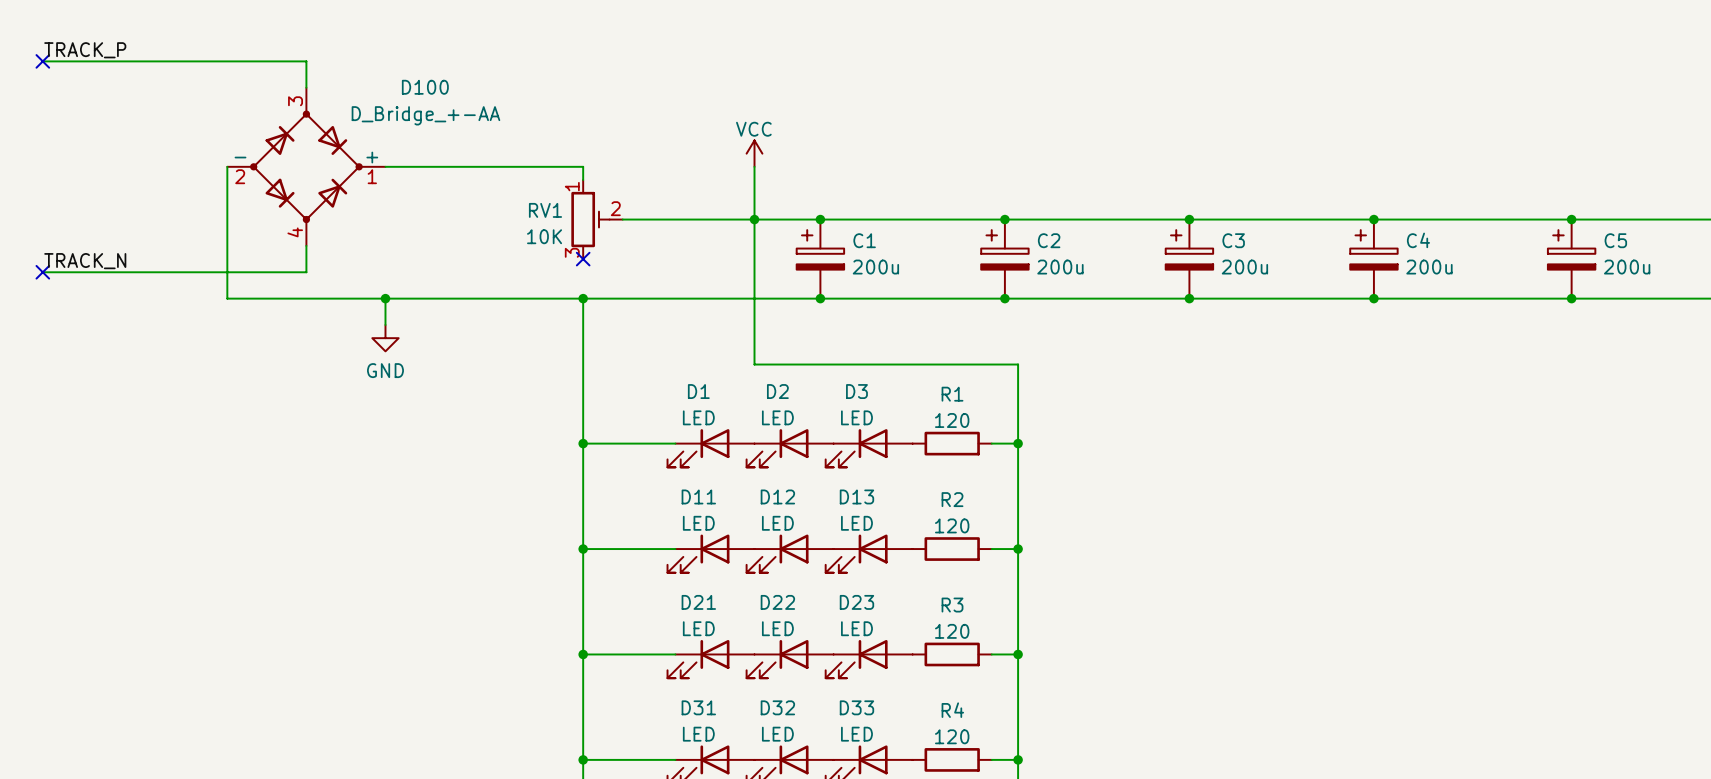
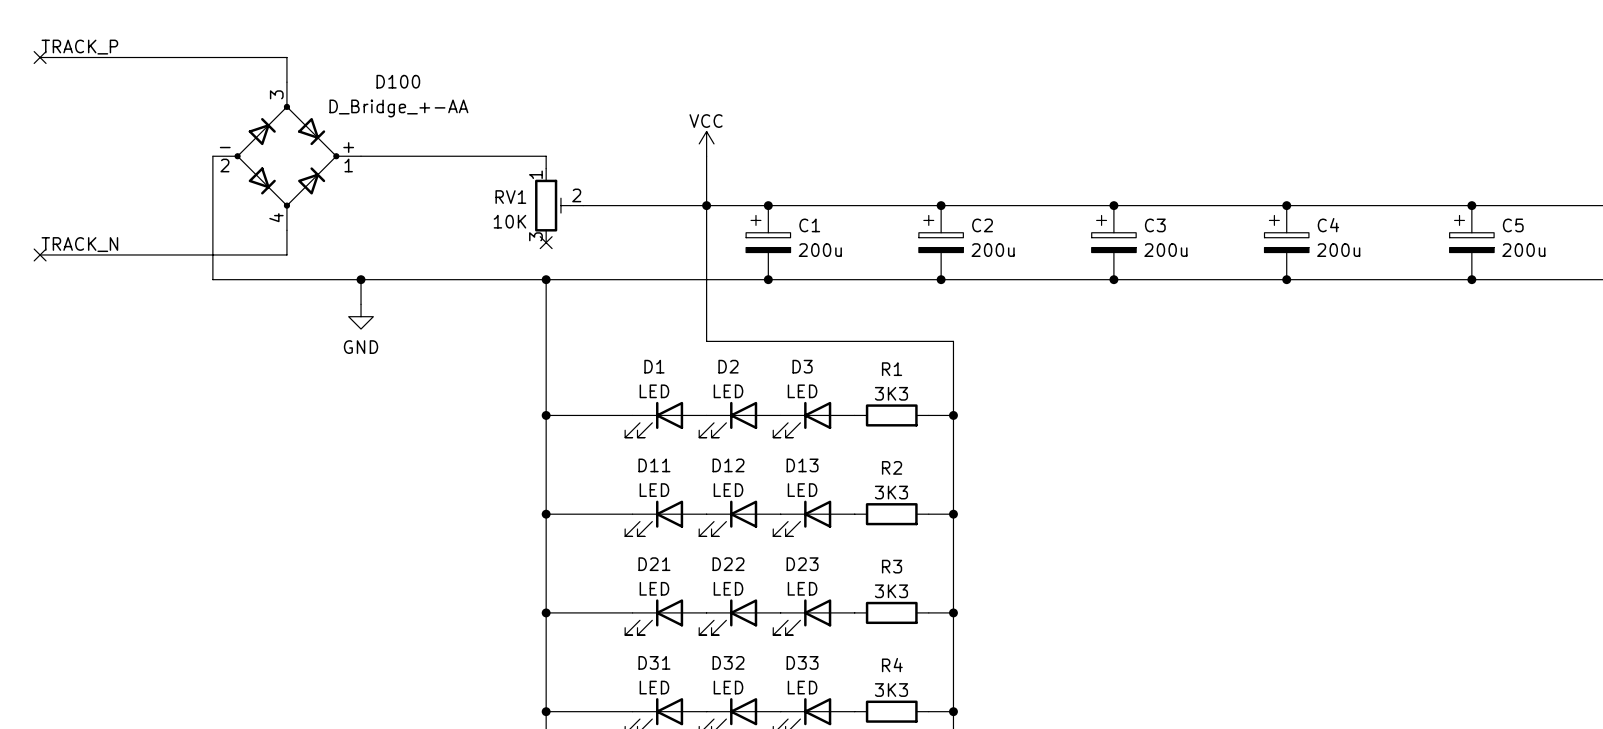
R1 value: 120 (952, 420) -> 3K3 (891, 393)
R2 value: 120 (952, 525) -> 3K3 (891, 492)
R3 value: 120 (952, 631) -> 3K3 (891, 591)
R4 value: 120 (952, 736) -> 3K3 (891, 690)

